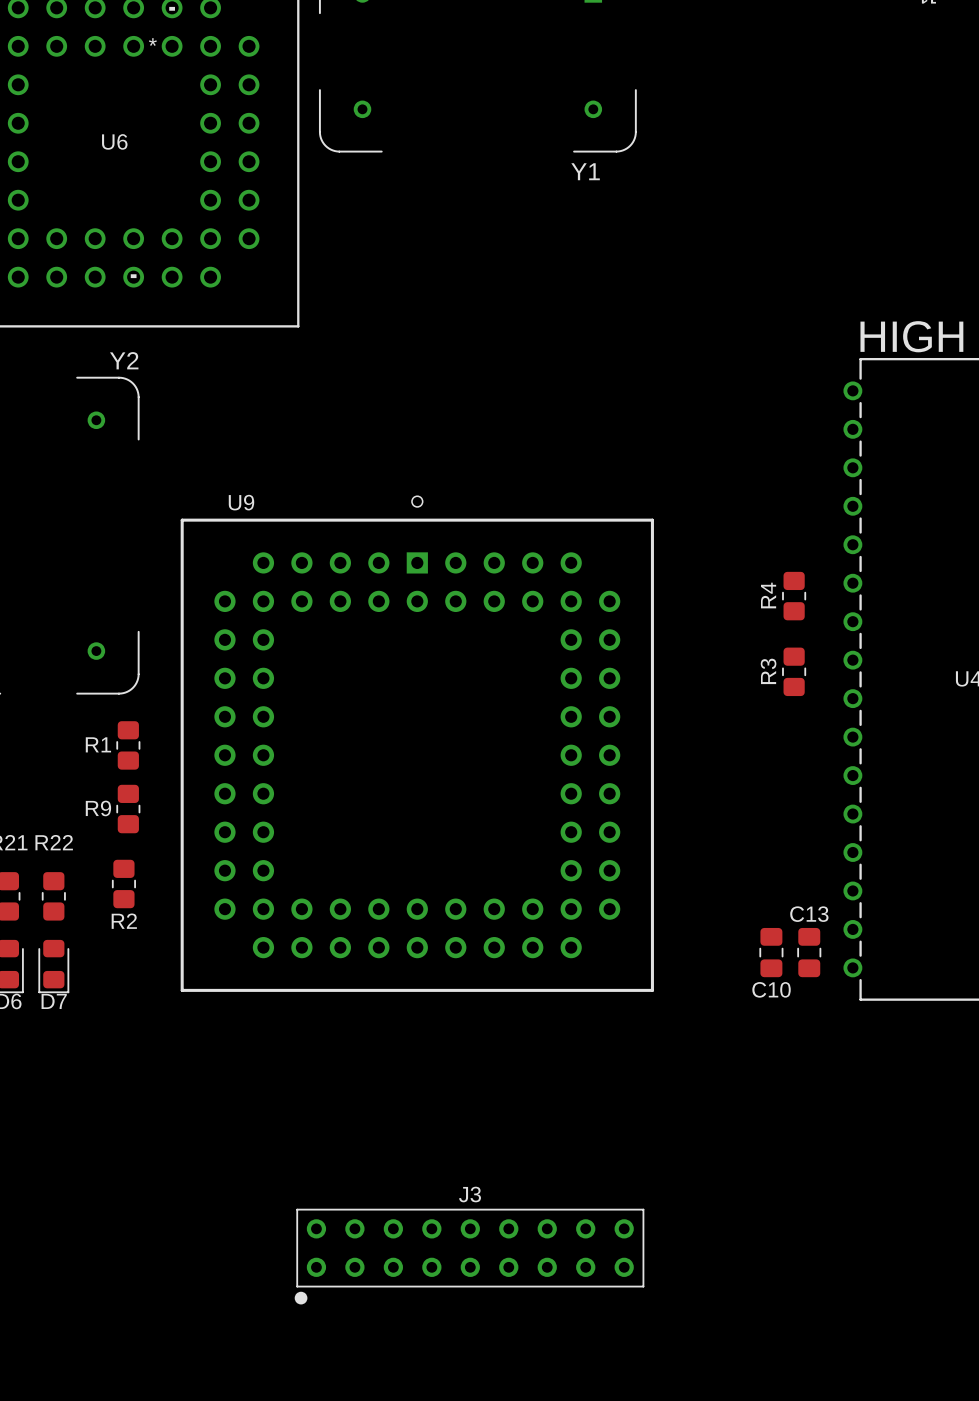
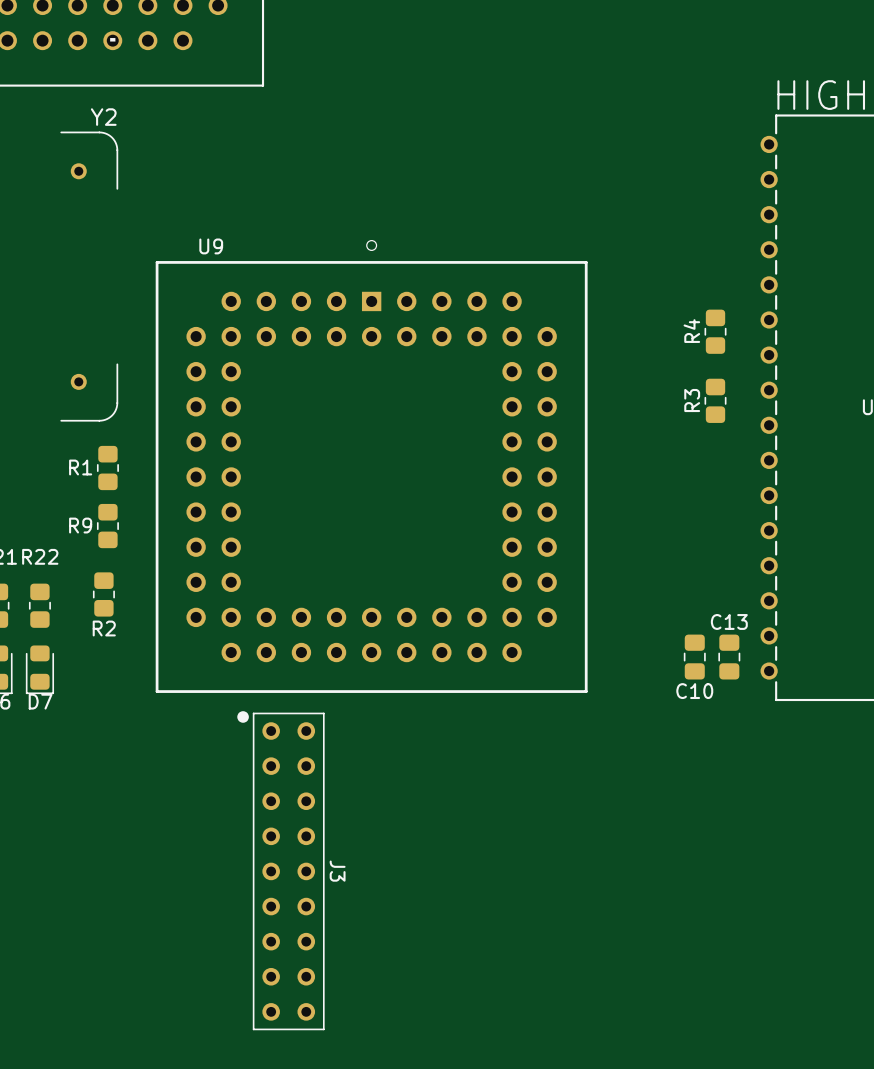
J3 rotation: 0° (469, 1256) -> 90° clockwise (280, 870)

